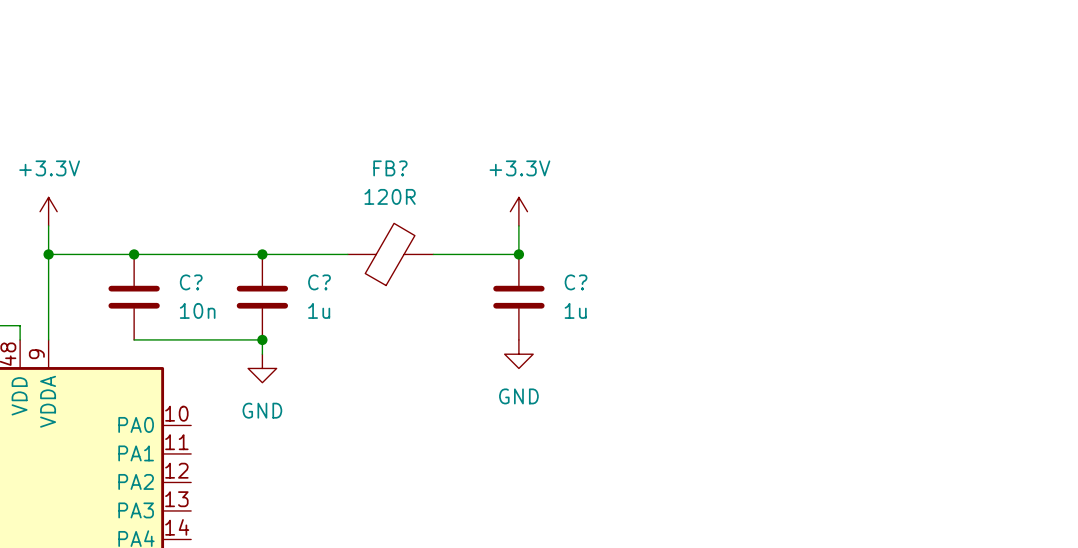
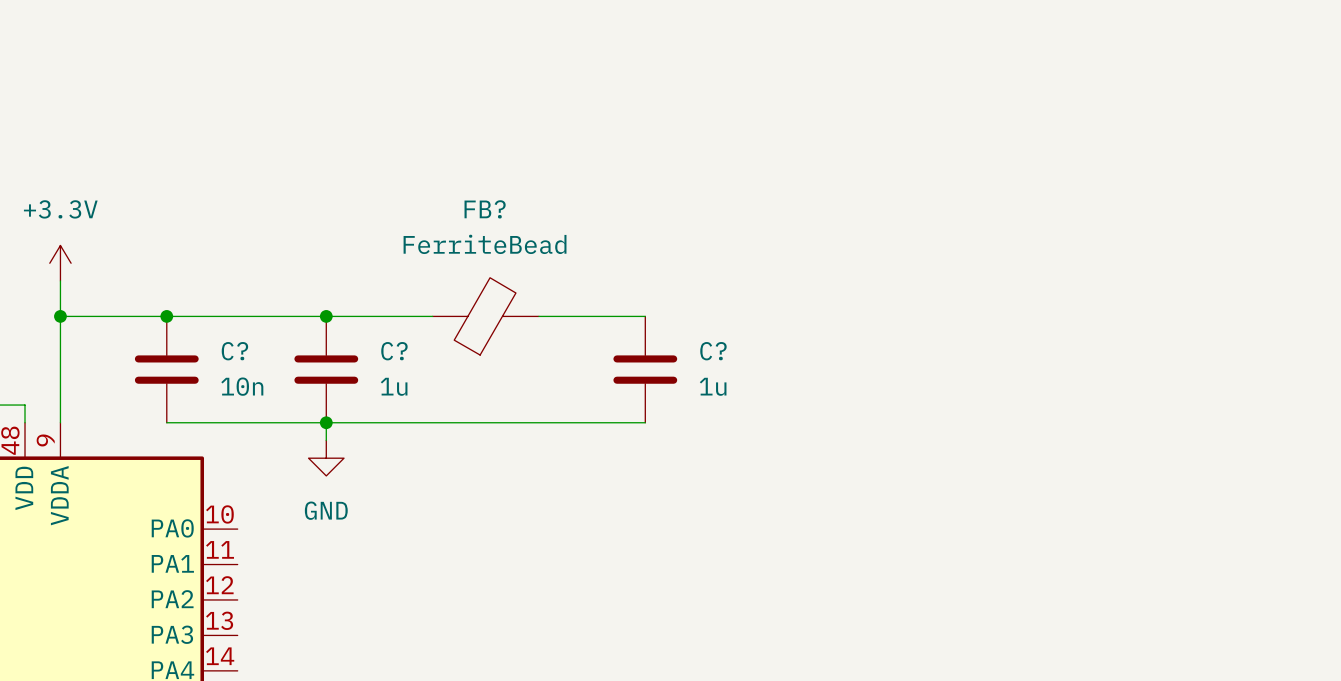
FB? value: 120R (390, 196) -> FerriteBead (485, 244)
power symbol: +3.3V (518, 211) -> none
wire: (518, 225) (518, 254) -> none
junction: (518, 254) -> none
wire: none -> (326, 422) (645, 422)
power symbol: GND (518, 354) -> none

